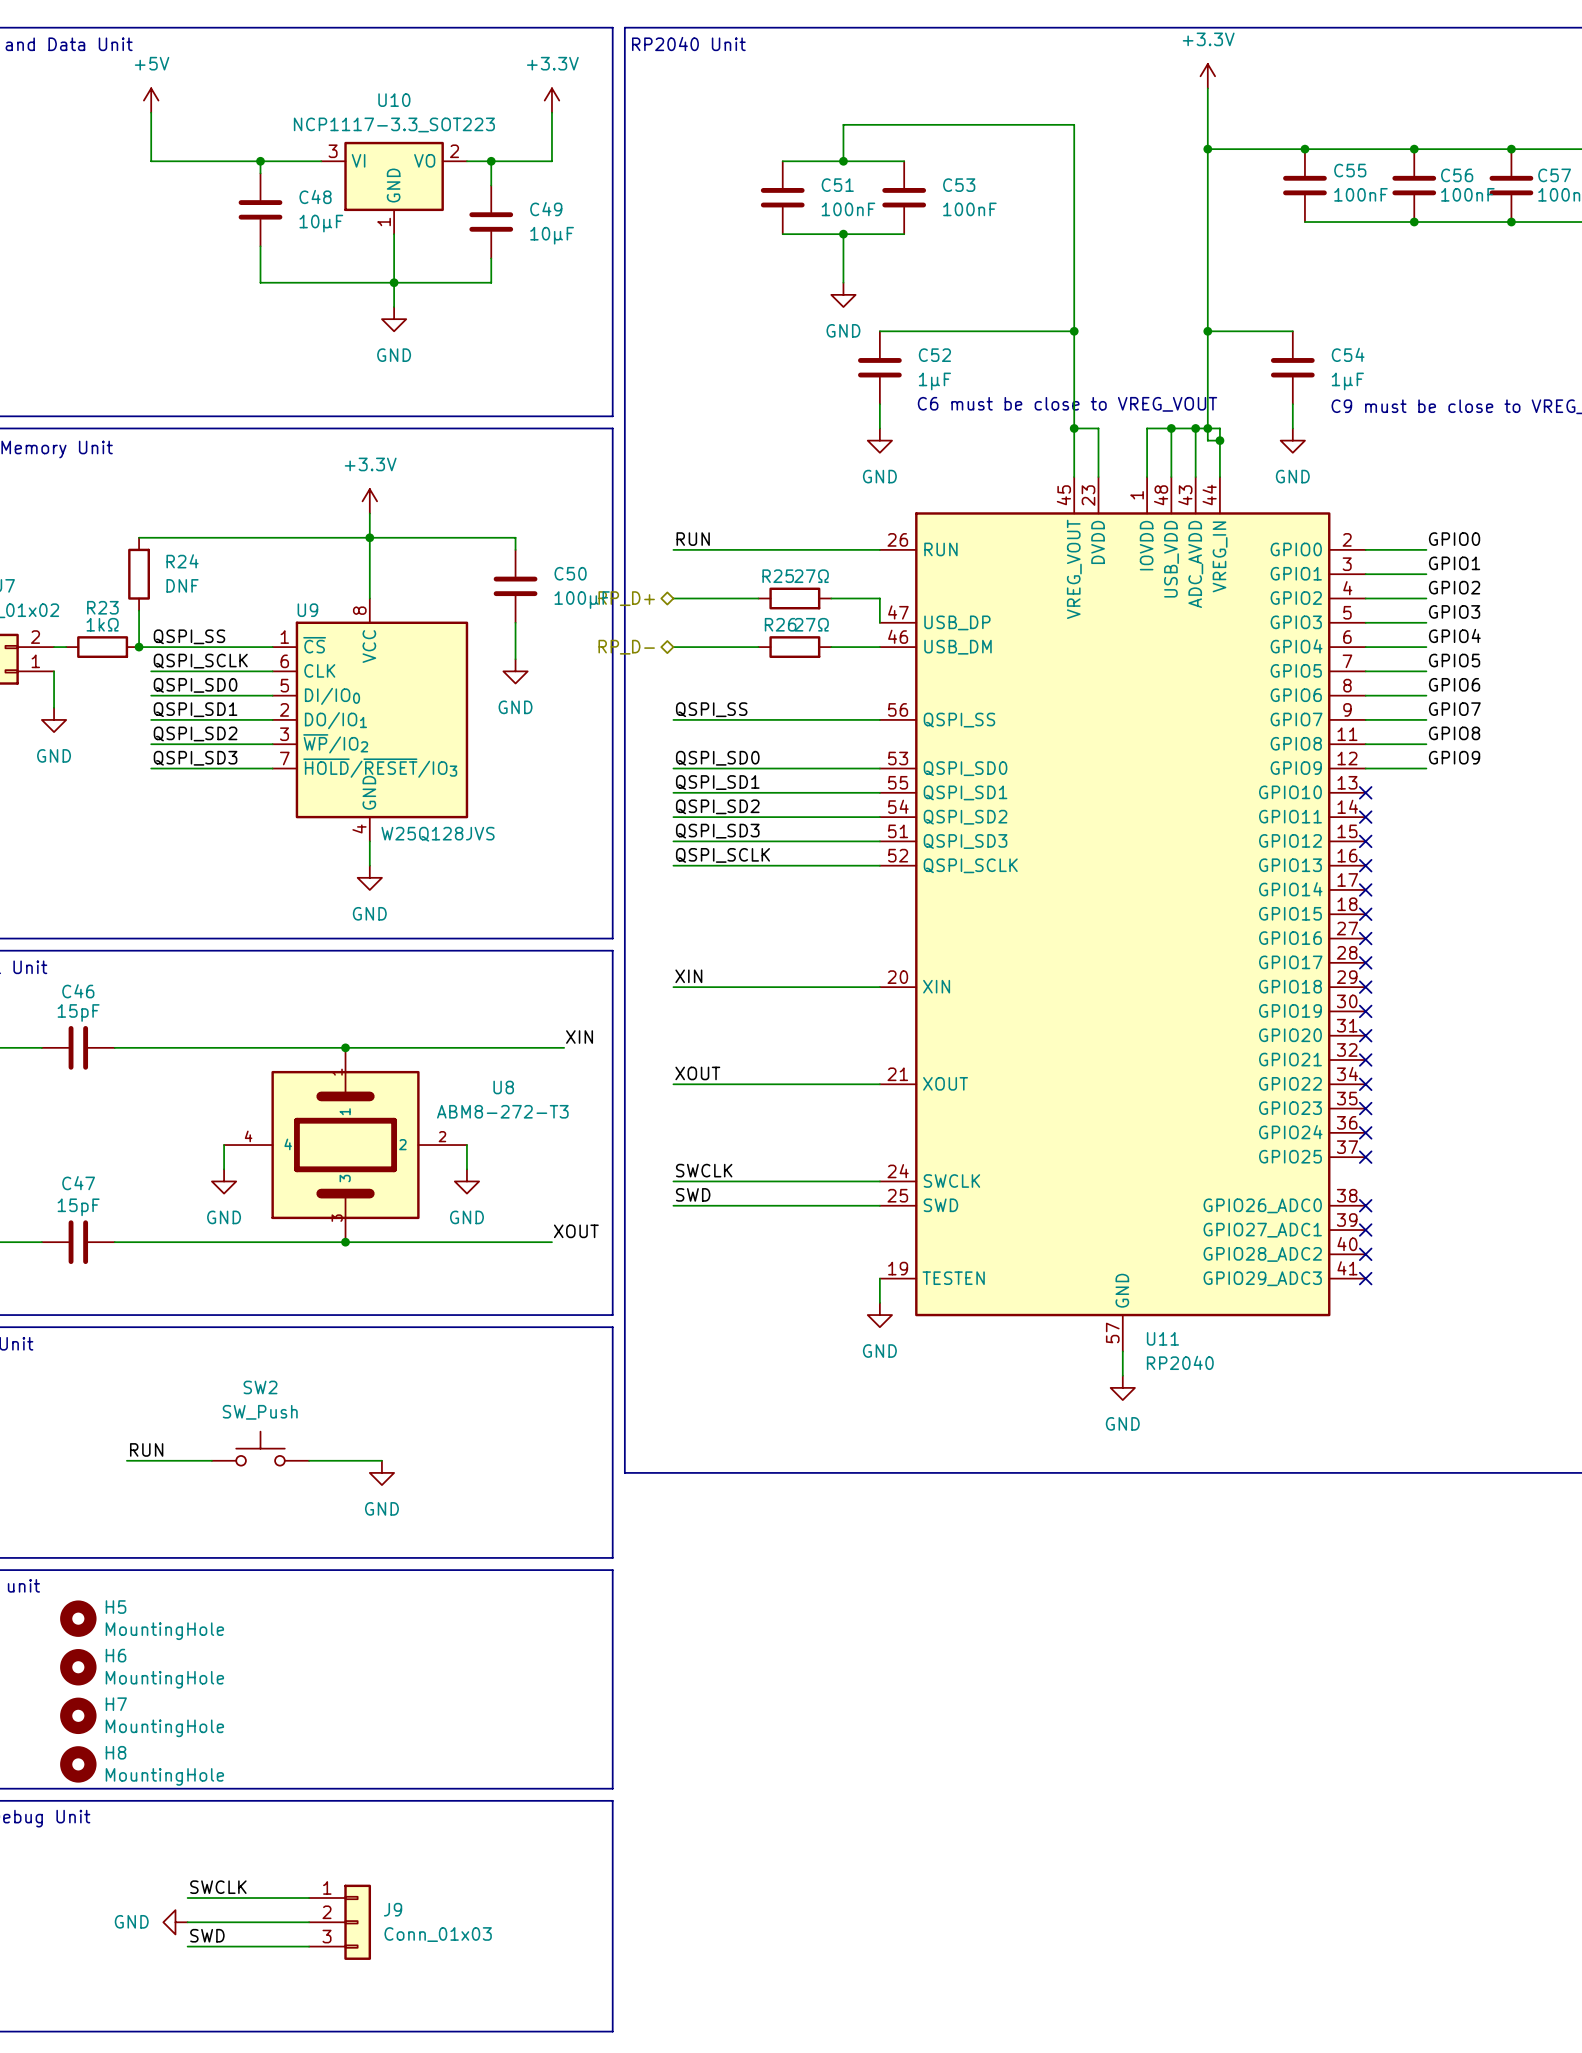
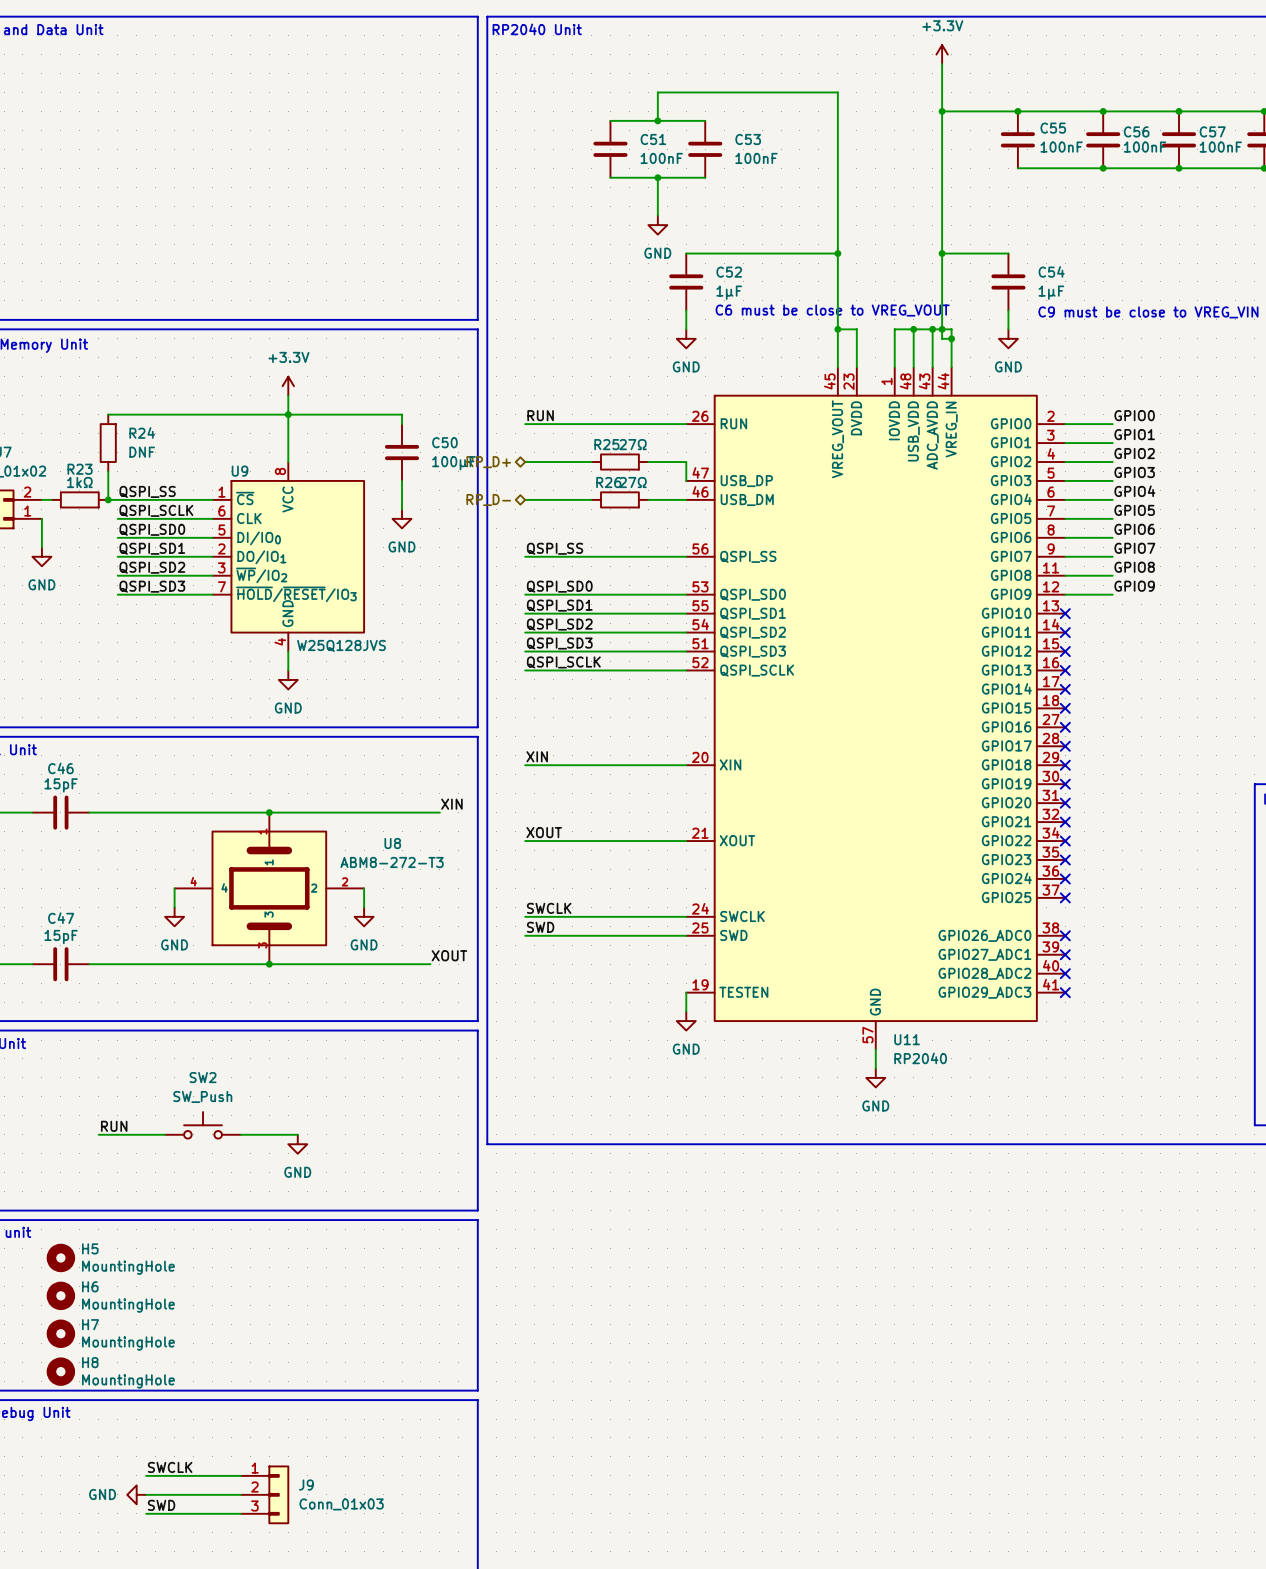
power symbol: +5V (151, 100) -> none
power symbol: +3.3V (551, 100) -> none
wire: (151, 112) (151, 161) (321, 161) -> none
wire: (551, 112) (551, 161) (466, 161) -> none
wire: (260, 161) (260, 173) -> none
junction: (260, 161) -> none
wire: (491, 161) (491, 185) -> none
junction: (491, 161) -> none
U10: NCP1117-3.3_SOT223 (394, 188) -> none
C48: 10μF (260, 209) -> none
C49: 10μF (491, 222) -> none
wire: (394, 234) (394, 307) -> none
wire: (260, 246) (260, 282) (491, 282) (491, 258) -> none
junction: (394, 282) -> none
power symbol: GND (394, 319) -> none

